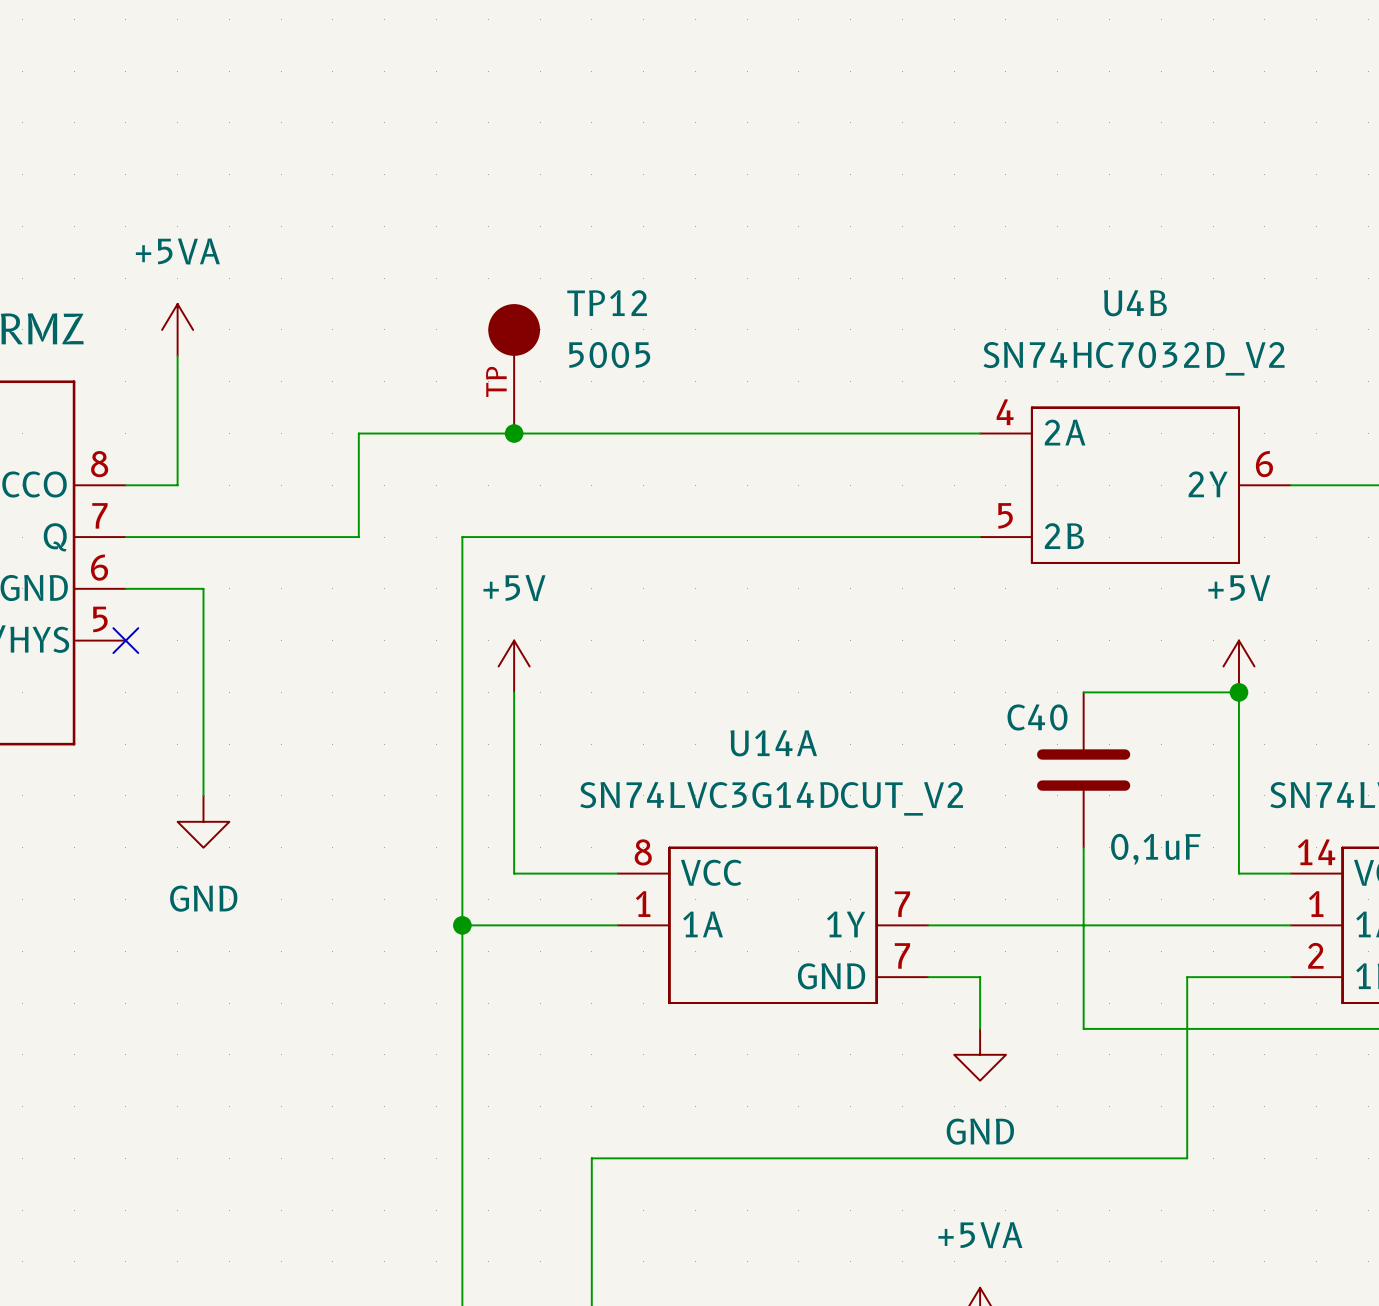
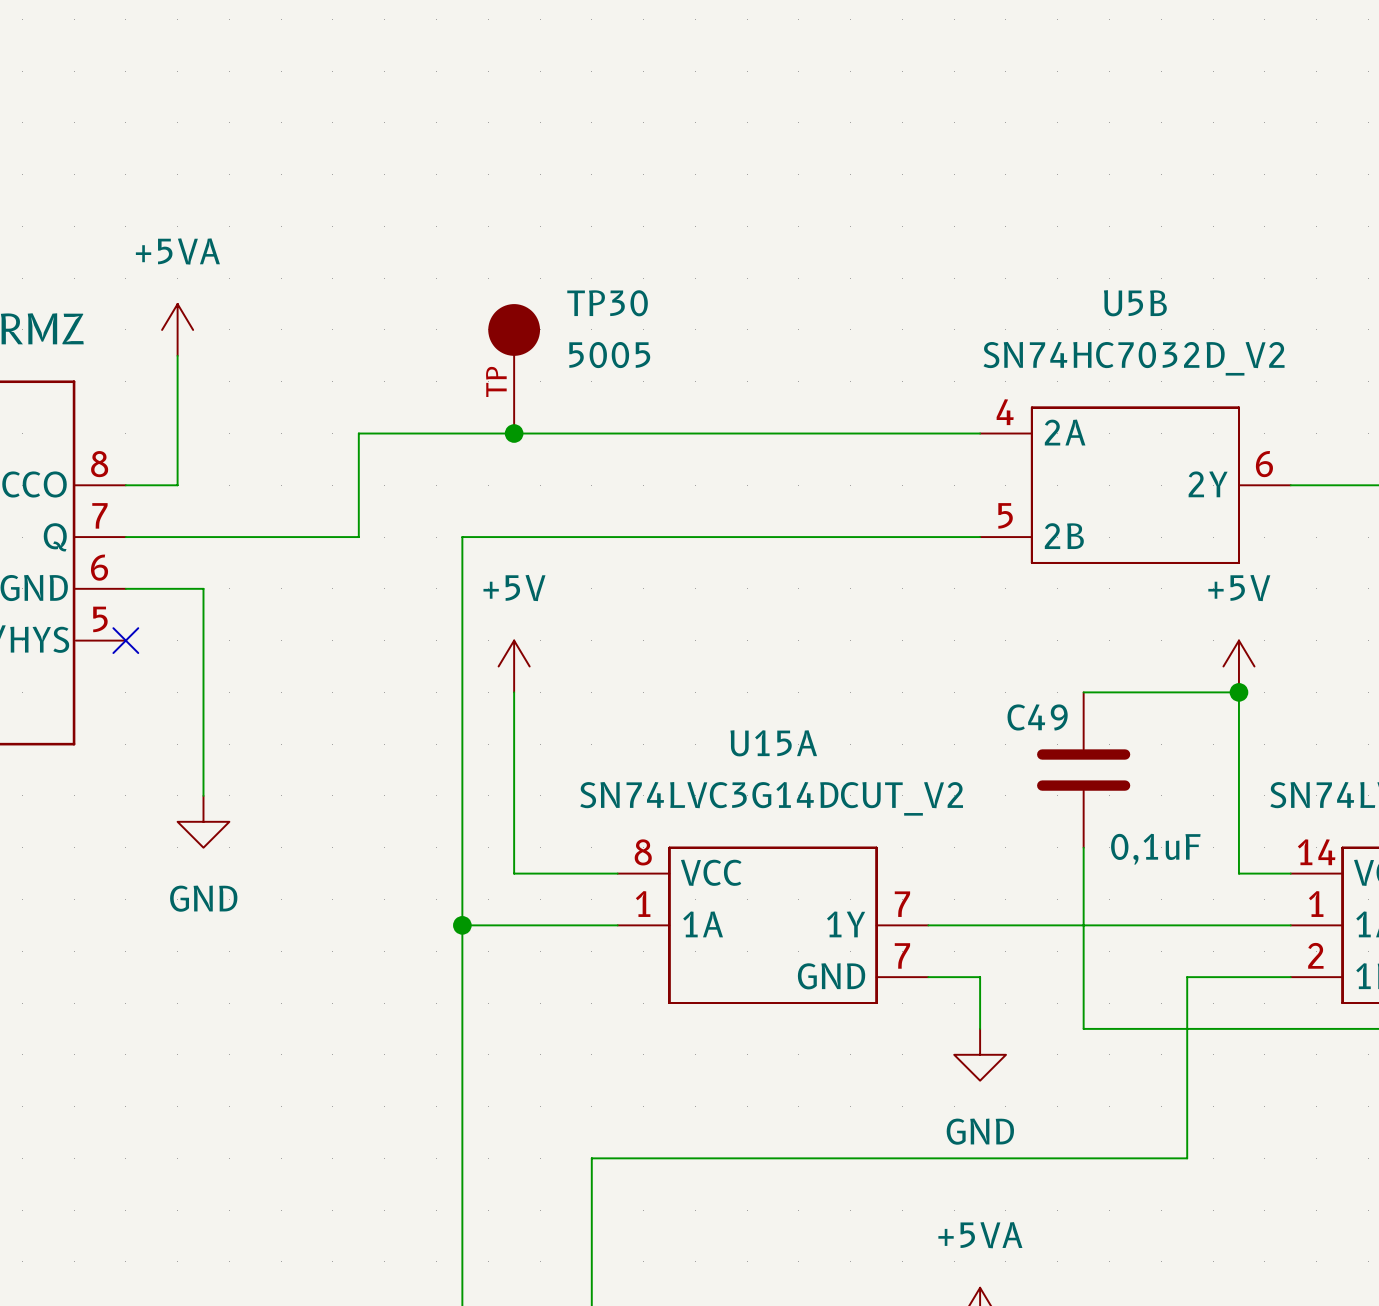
TP12 name: TP12 (607, 303) -> TP30 (607, 303)
U4B name: U4B (1135, 303) -> U5B (1135, 303)
C40 name: C40 (1037, 717) -> C49 (1037, 717)
U14A name: U14A (773, 743) -> U15A (773, 743)

